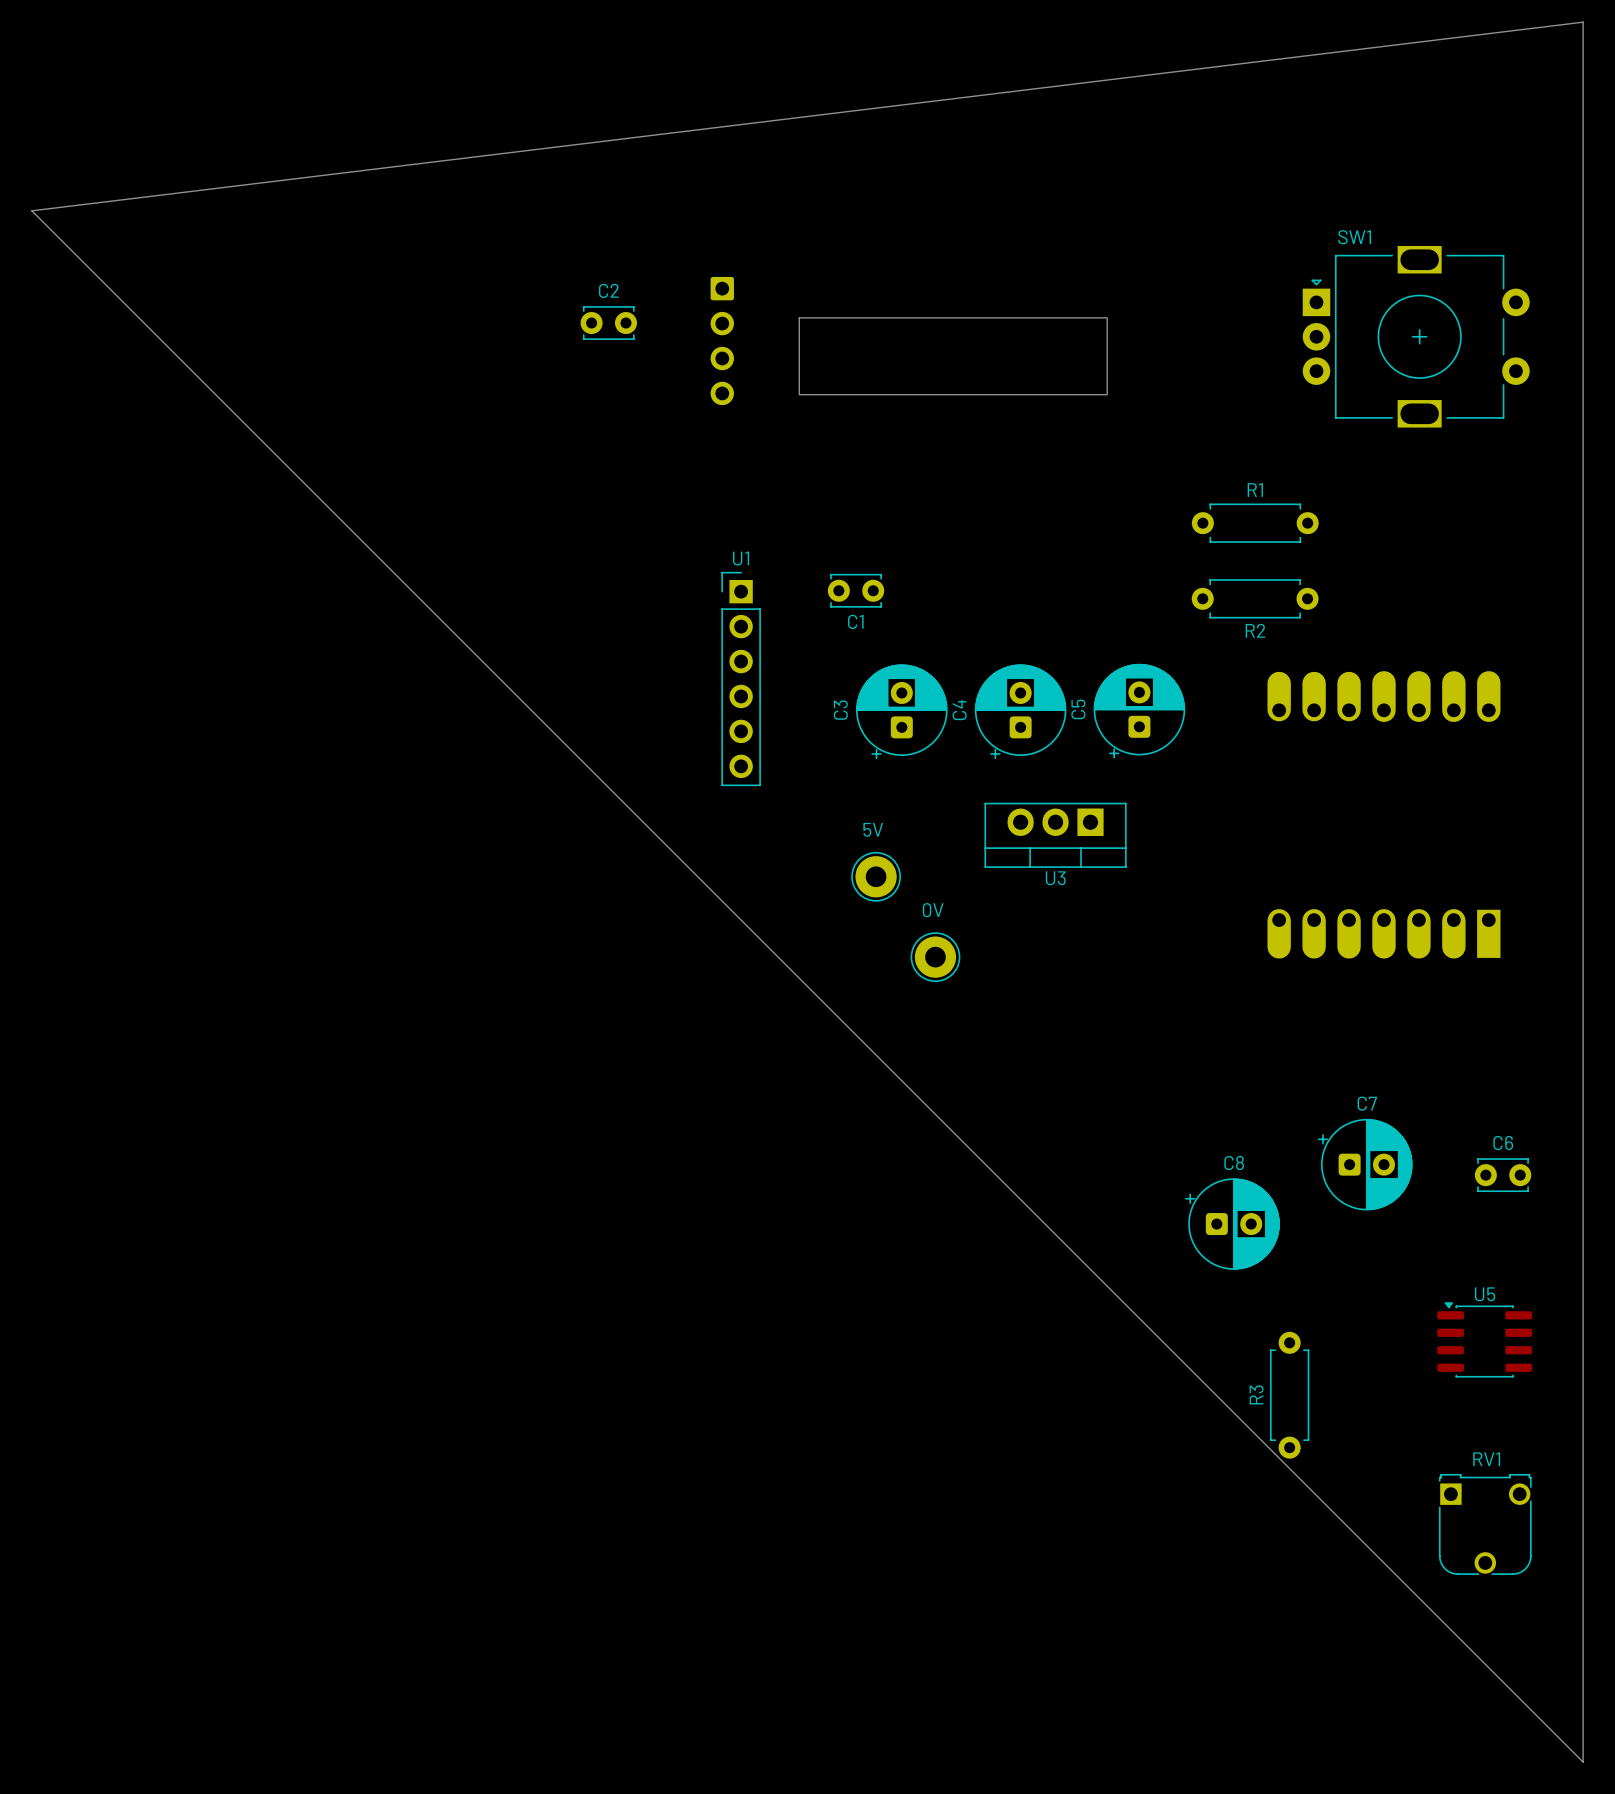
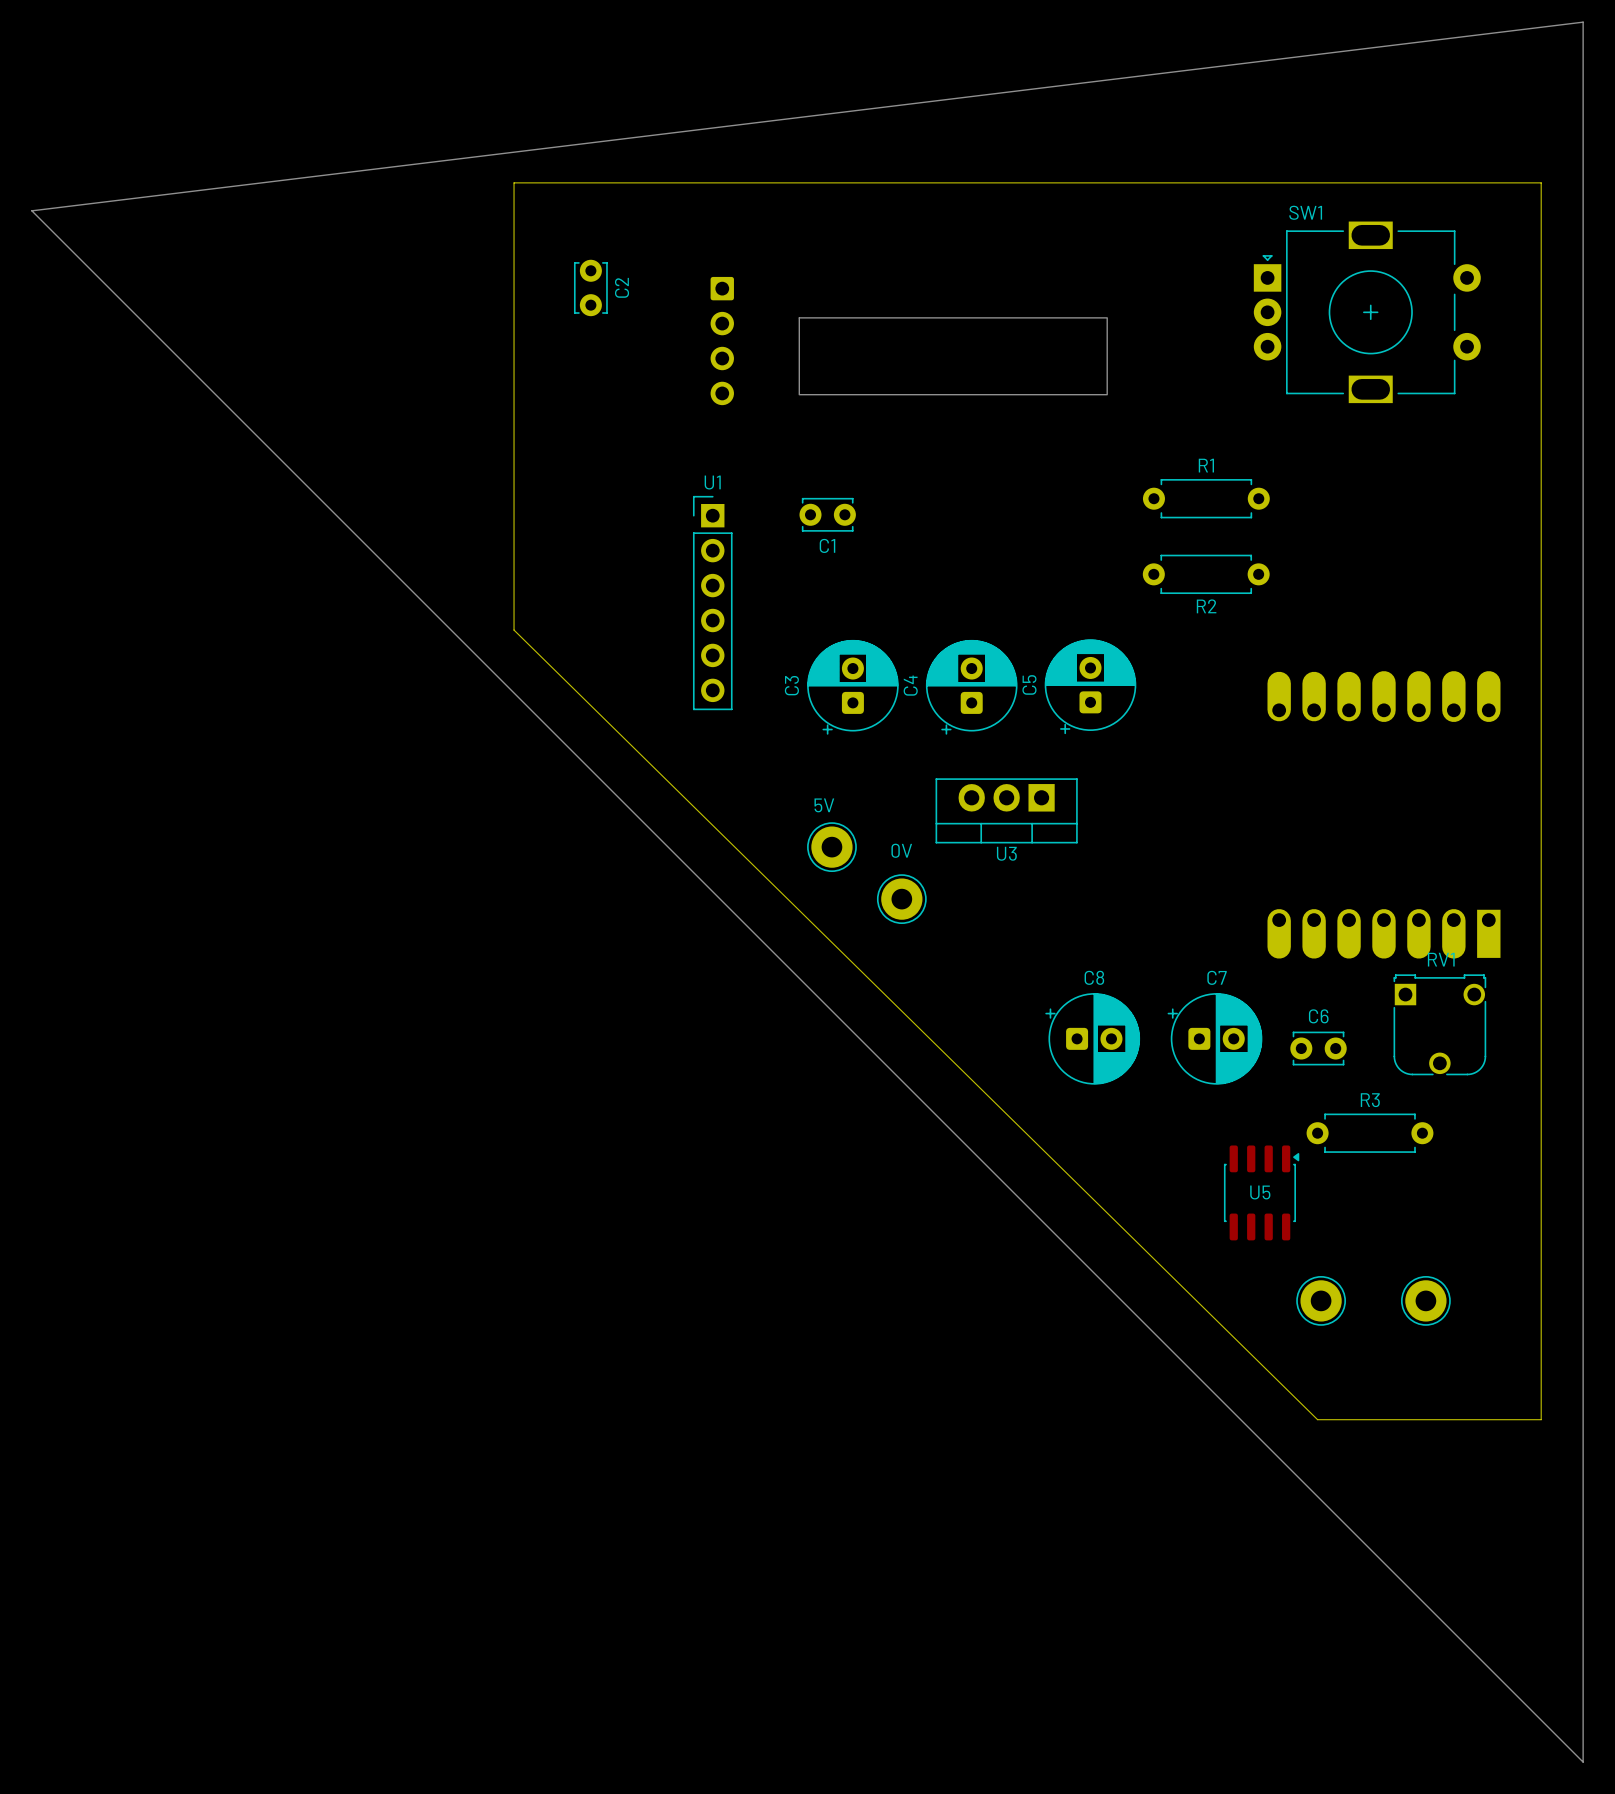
board edge: none -> (514, 182) (514, 630) (1317, 1419) (1541, 1419) (1541, 182) (514, 182)
C2 rotation: 0° (608, 323) -> 90° clockwise (590, 287)
C2 position: (608, 323) -> (590, 287)
SW1 position: (1416, 336) -> (1367, 312)
R1 position: (1255, 523) -> (1206, 498)
C1 position: (856, 590) -> (827, 514)
R2 position: (1255, 598) -> (1206, 574)
U1 position: (741, 679) -> (712, 603)
C3 position: (901, 711) -> (852, 687)
C4 position: (1020, 711) -> (971, 687)
C5 position: (1139, 711) -> (1090, 686)
text position: 5V (873, 829) -> 5V (824, 805)
U3 position: (1055, 835) -> (1006, 810)
part: none -> (831, 847)
part: (876, 876) -> none
part: none -> (901, 899)
text position: 0V (933, 910) -> 0V (901, 850)
part: (935, 957) -> none
C7 position: (1365, 1164) -> (1214, 1038)
C6 position: (1503, 1175) -> (1318, 1048)
C8 position: (1232, 1224) -> (1092, 1038)
U5 name position: U5 (1485, 1294) -> U5 (1260, 1192)
part: none -> (1321, 1300)
part: none -> (1425, 1300)
U5 rotation: 0° (1484, 1339) -> 90° clockwise (1261, 1192)
U5 position: (1484, 1339) -> (1261, 1192)
R3 rotation: 0° (1289, 1395) -> 90° clockwise (1370, 1133)
R3 position: (1289, 1395) -> (1370, 1133)
RV1 position: (1485, 1524) -> (1439, 1024)

